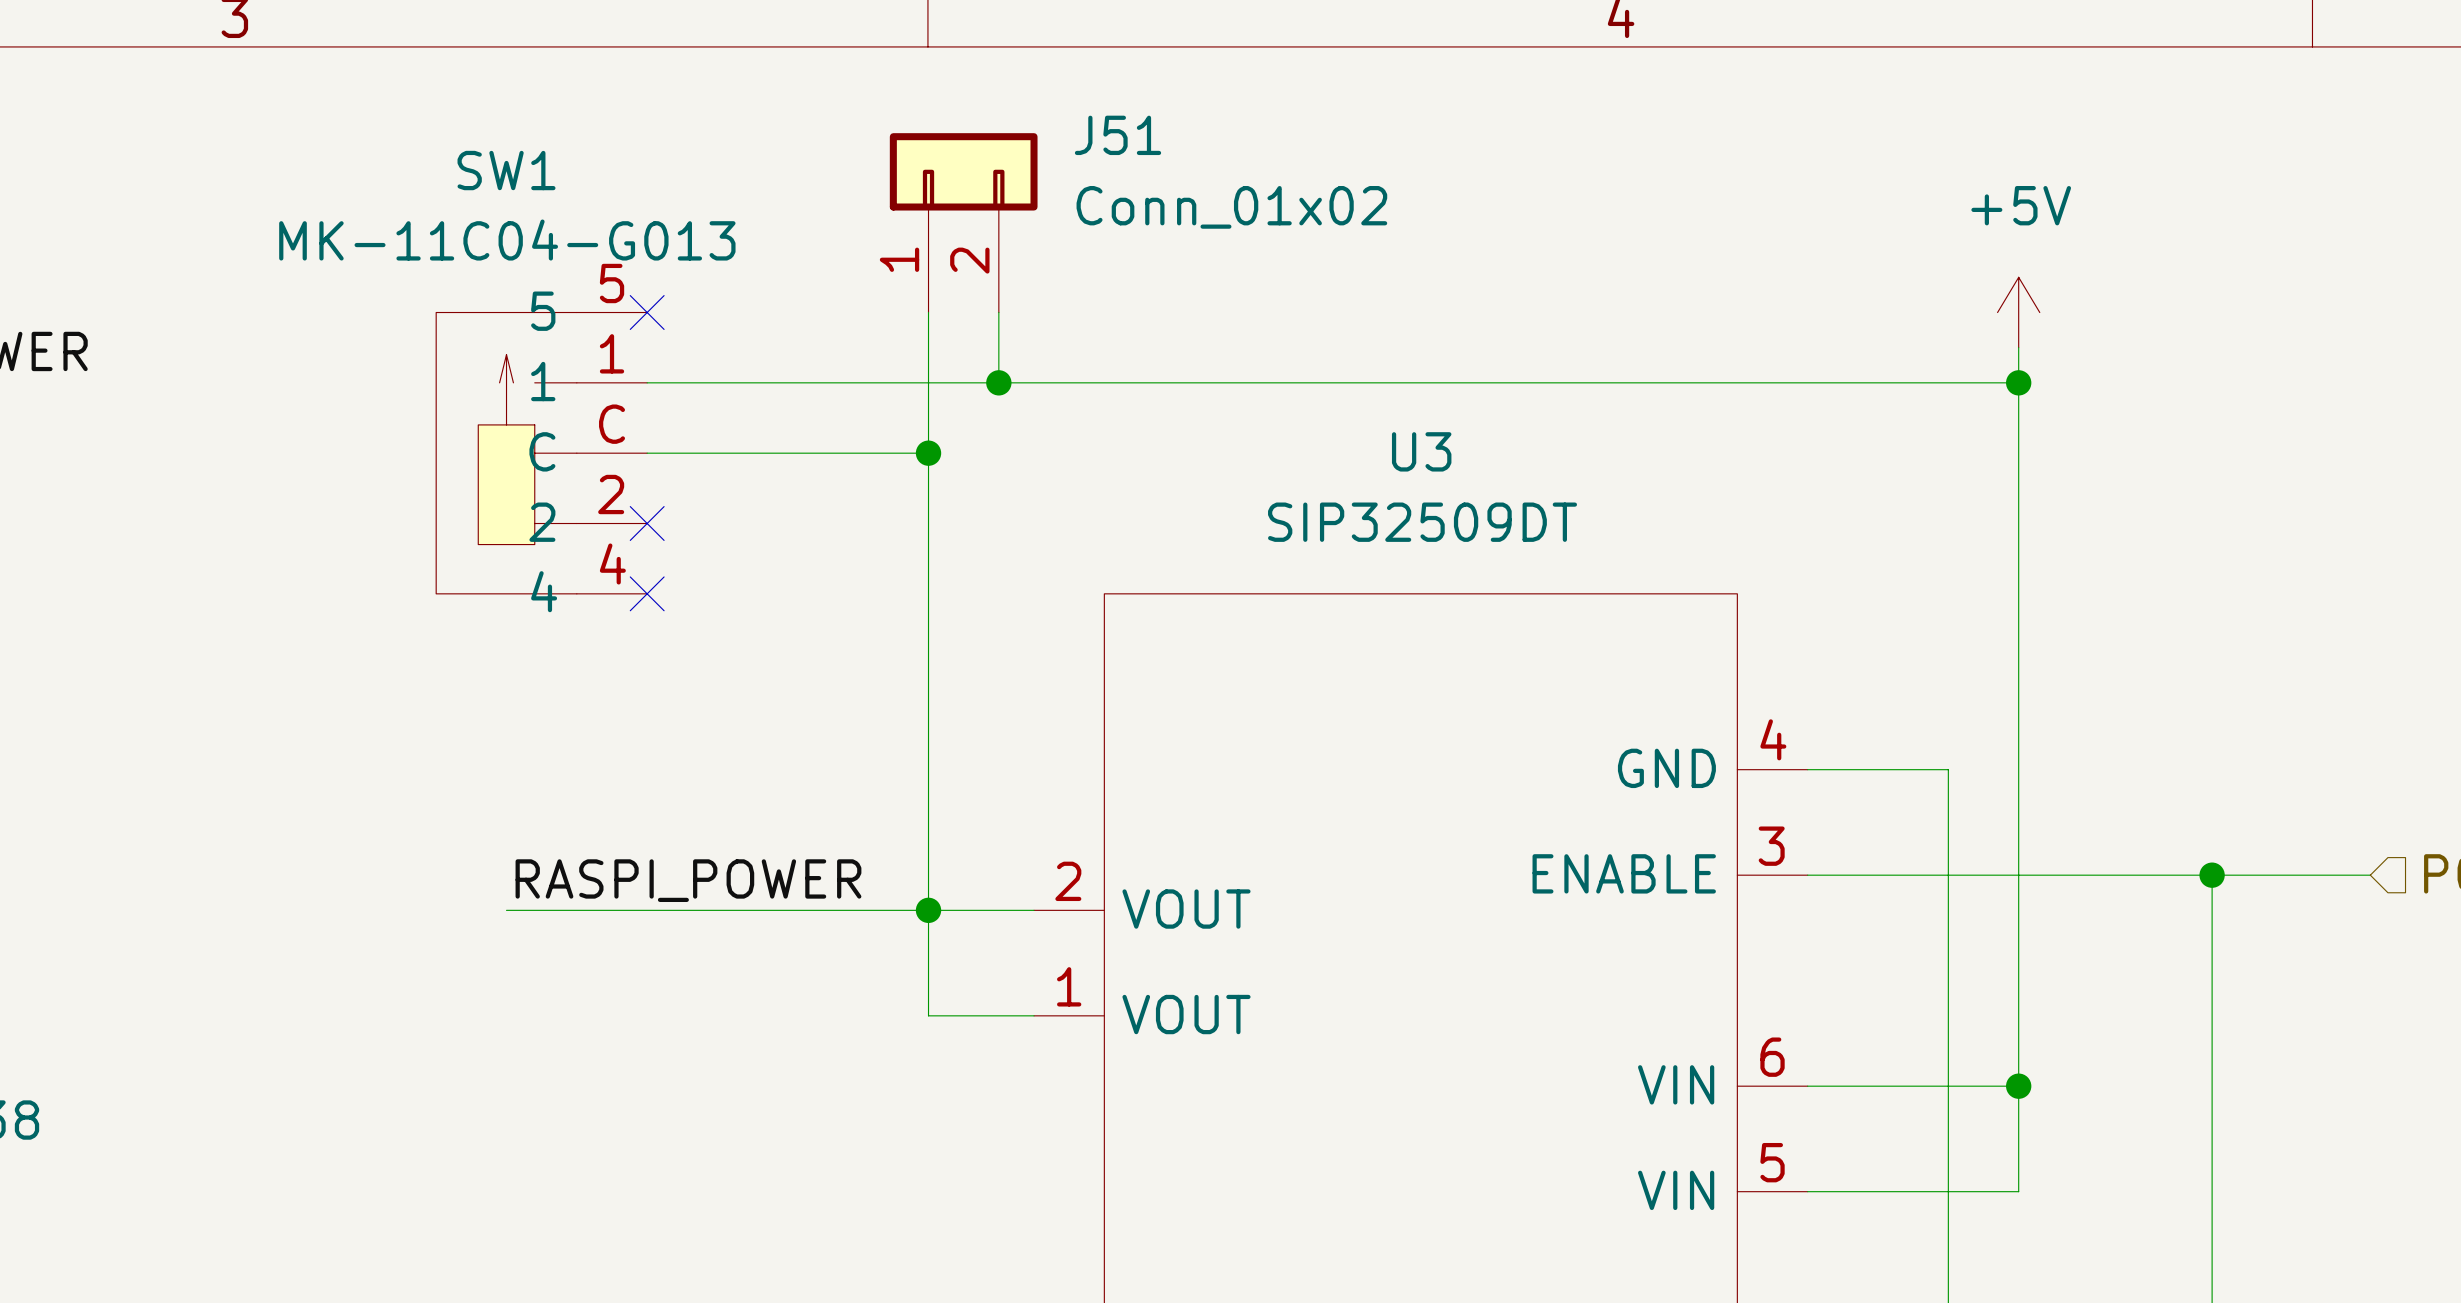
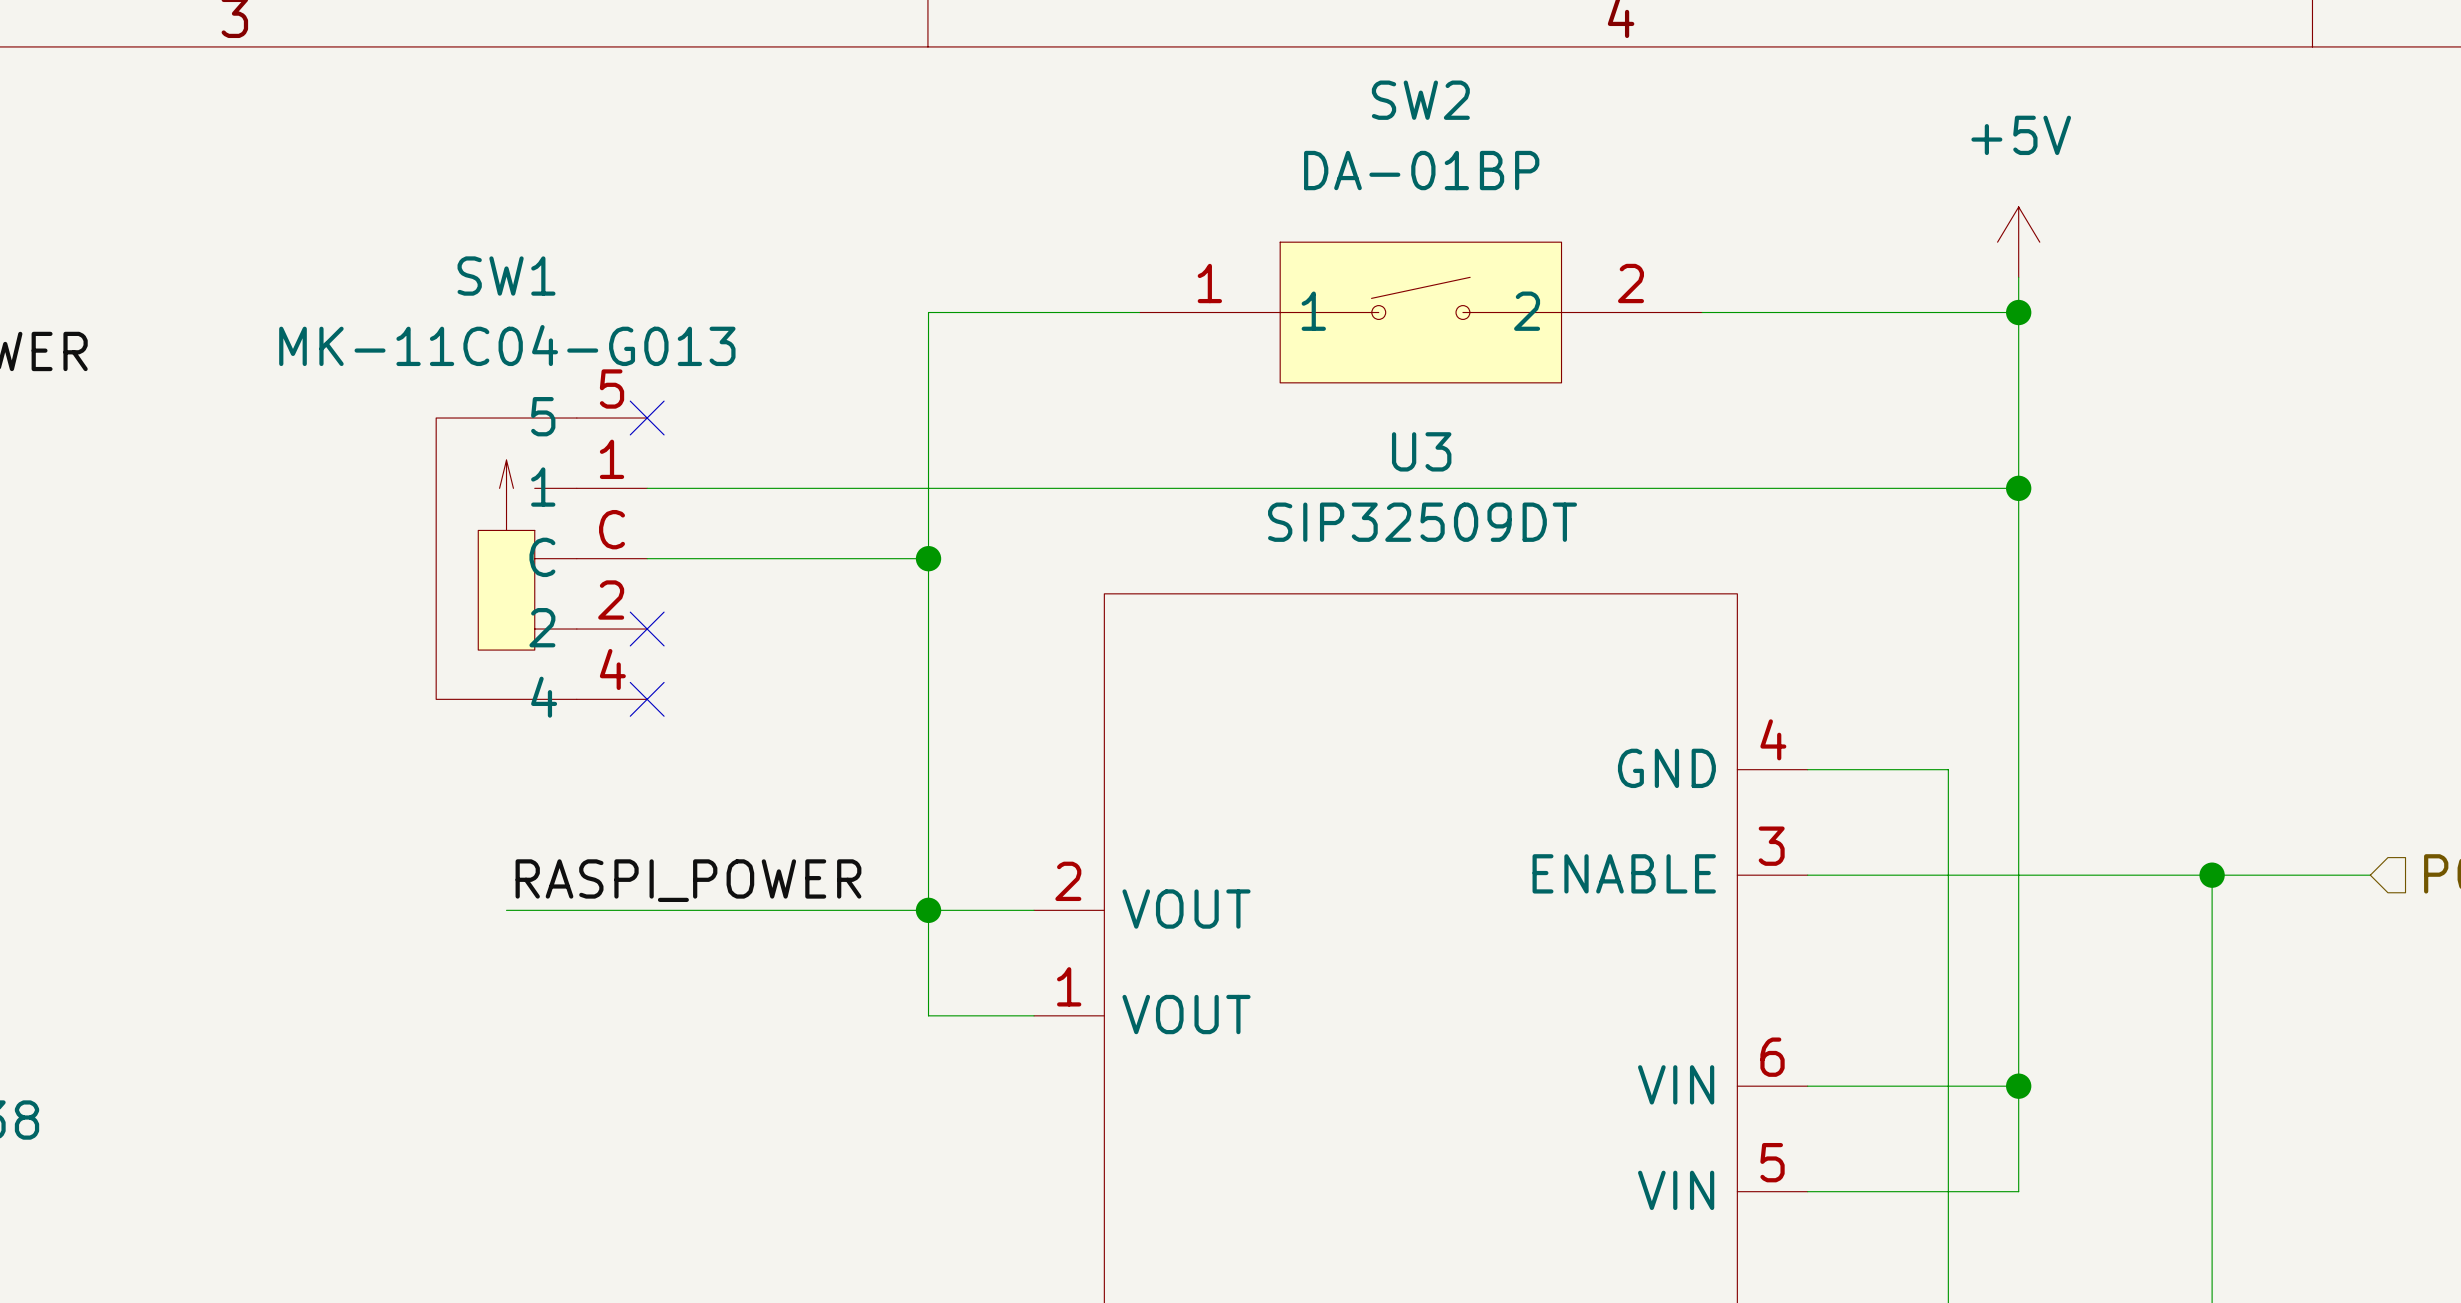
J51: Conn_01x02 (963, 222) -> none
no-connect mark: (647, 312) -> none
wire: none -> (928, 312) (1139, 312)
wire: (998, 312) (998, 382) -> none
SW2: none -> DA-01BP (1420, 312)
wire: none -> (1702, 312) (2018, 312)
junction: none -> (2018, 312)
power symbol position: +5V (2018, 312) -> +5V (2018, 242)
wire: (647, 382) (2018, 382) -> (647, 488) (2018, 488)
junction: (998, 382) -> none
junction: (2018, 382) -> none
no-connect mark: none -> (647, 418)
SW1 position: (541, 453) -> (541, 558)
wire: (647, 453) (928, 453) -> (647, 558) (928, 558)
junction: (928, 453) -> none
junction: none -> (2018, 488)
no-connect mark: (647, 523) -> none
junction: none -> (928, 558)
no-connect mark position: (647, 593) -> (647, 629)
no-connect mark: none -> (647, 699)

